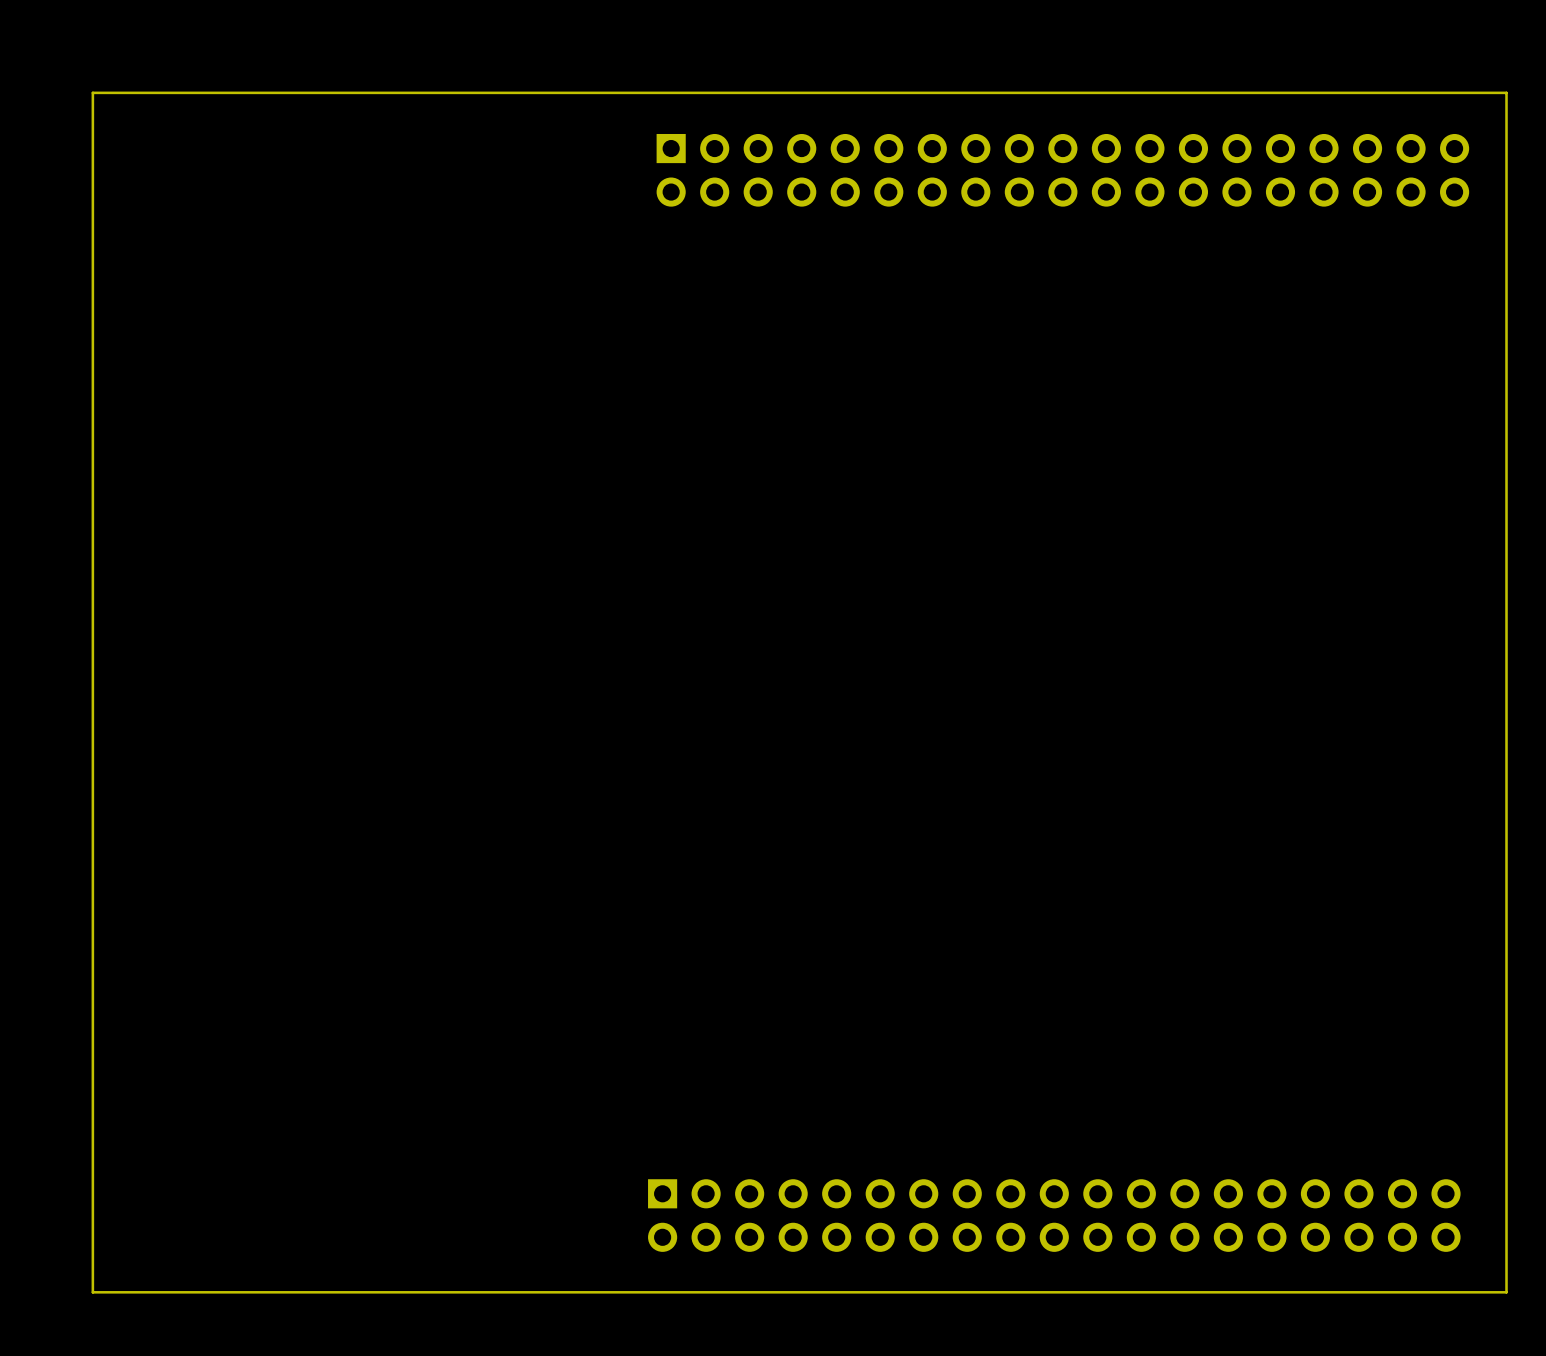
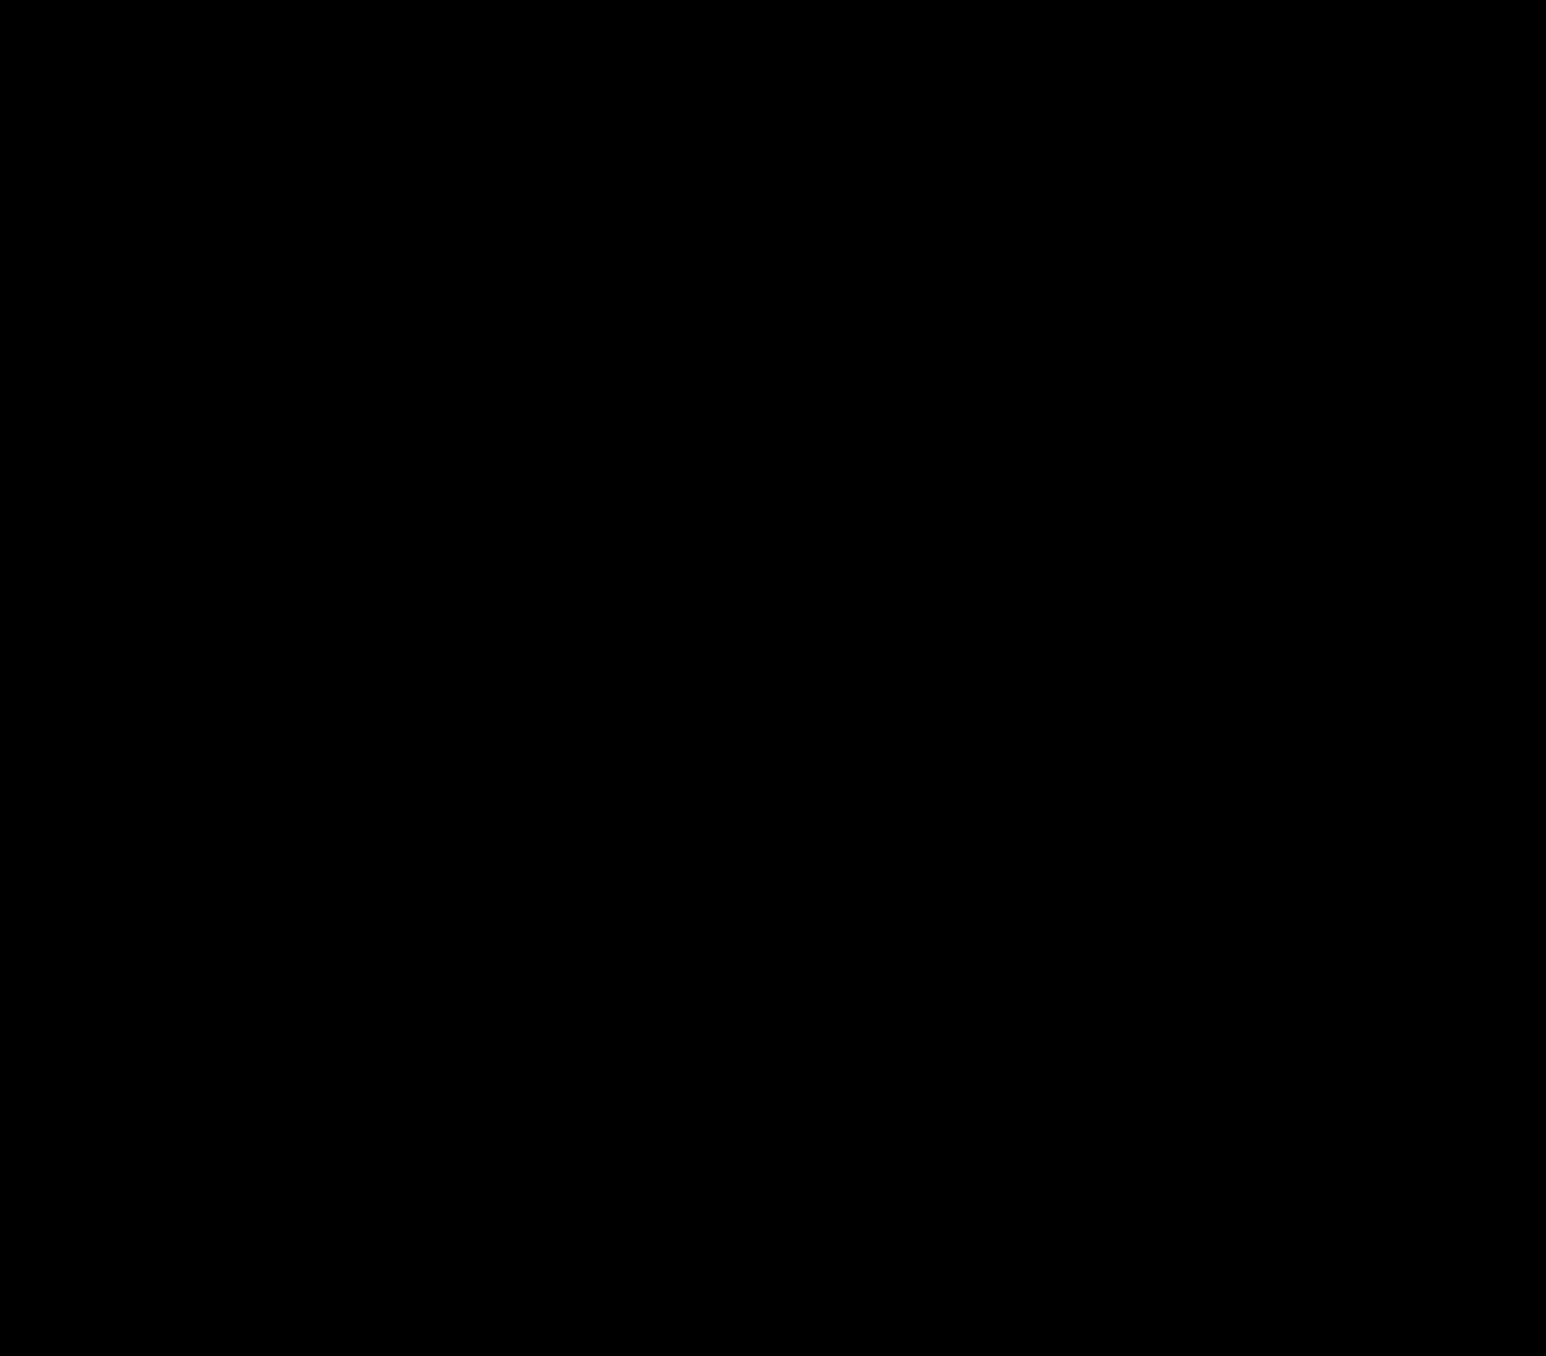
board edge: (1506, 92) (92, 92) (92, 1292) (1506, 1292) (1506, 92) -> none
part: (1062, 170) -> none
part: (1054, 1215) -> none

